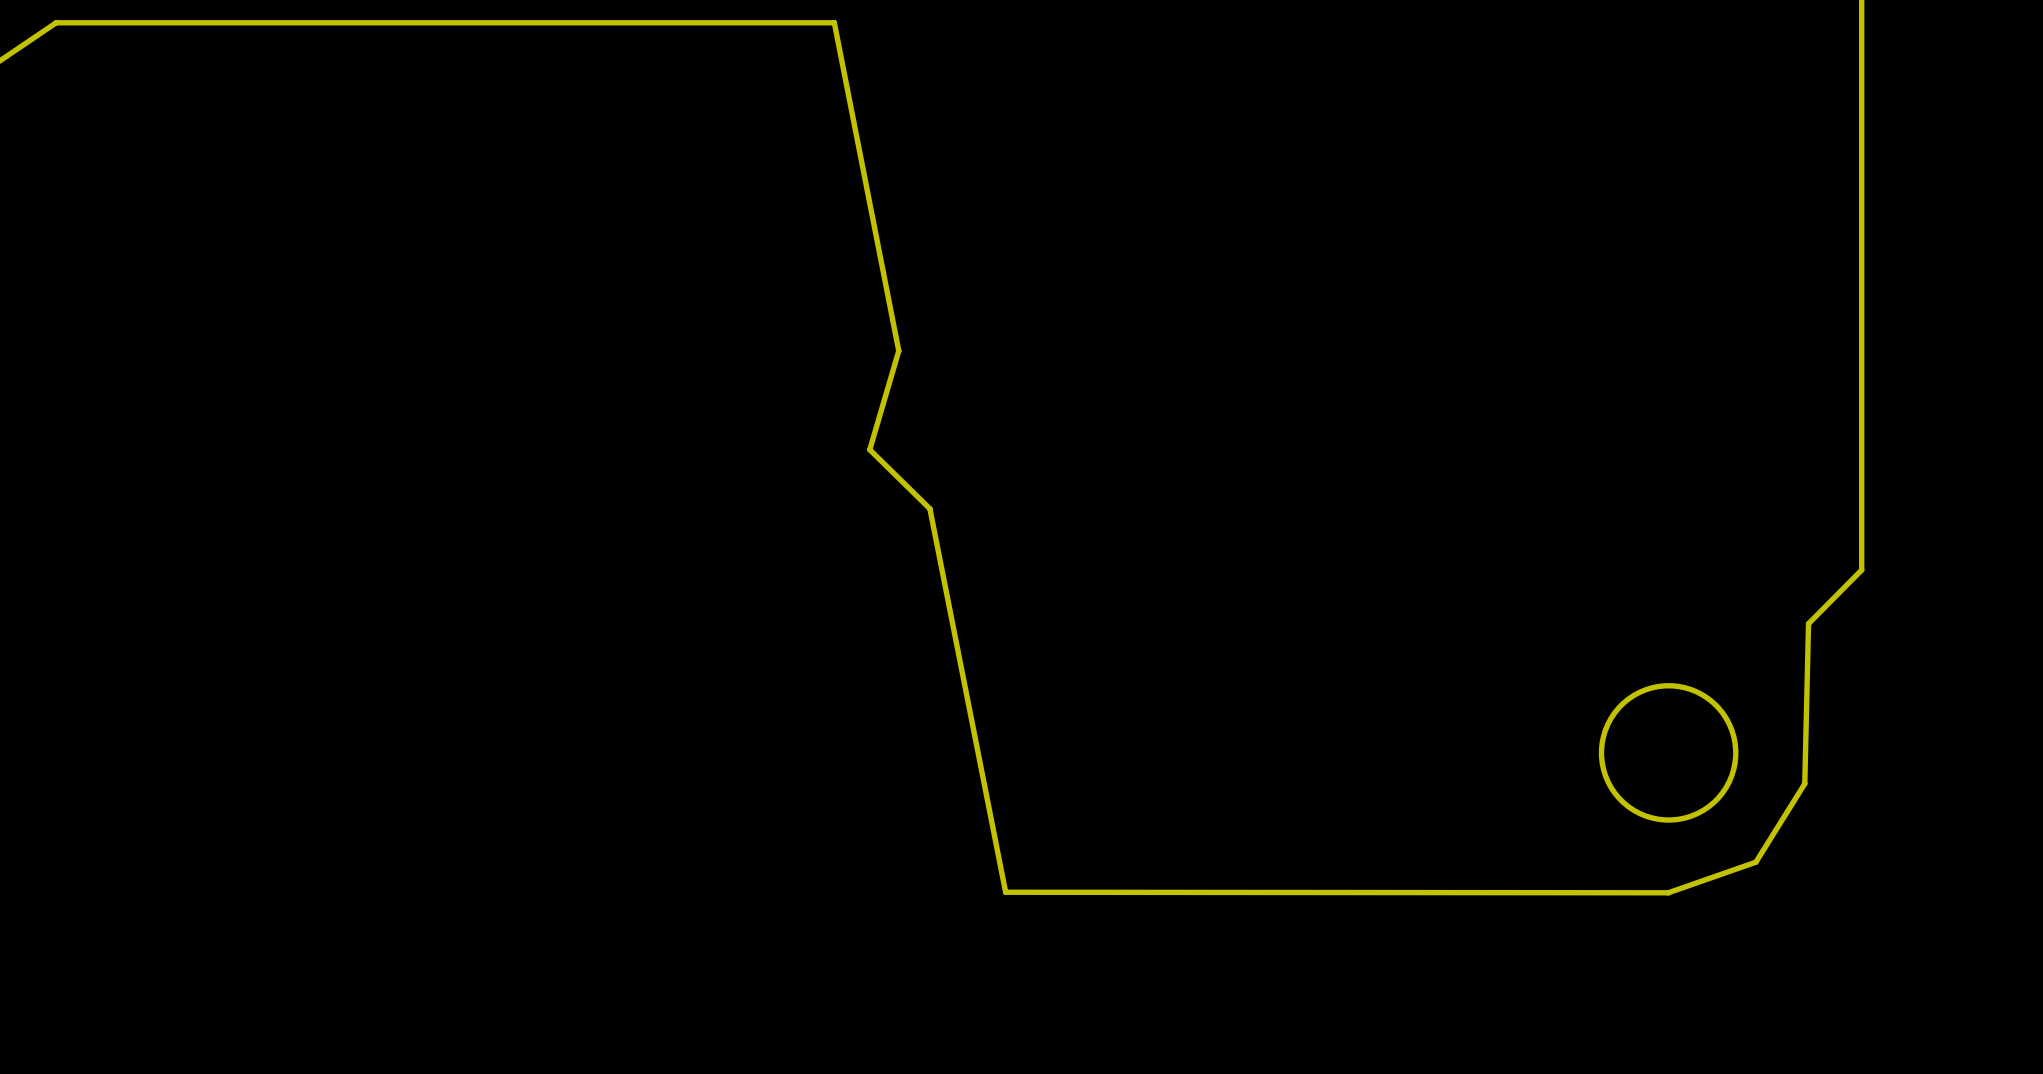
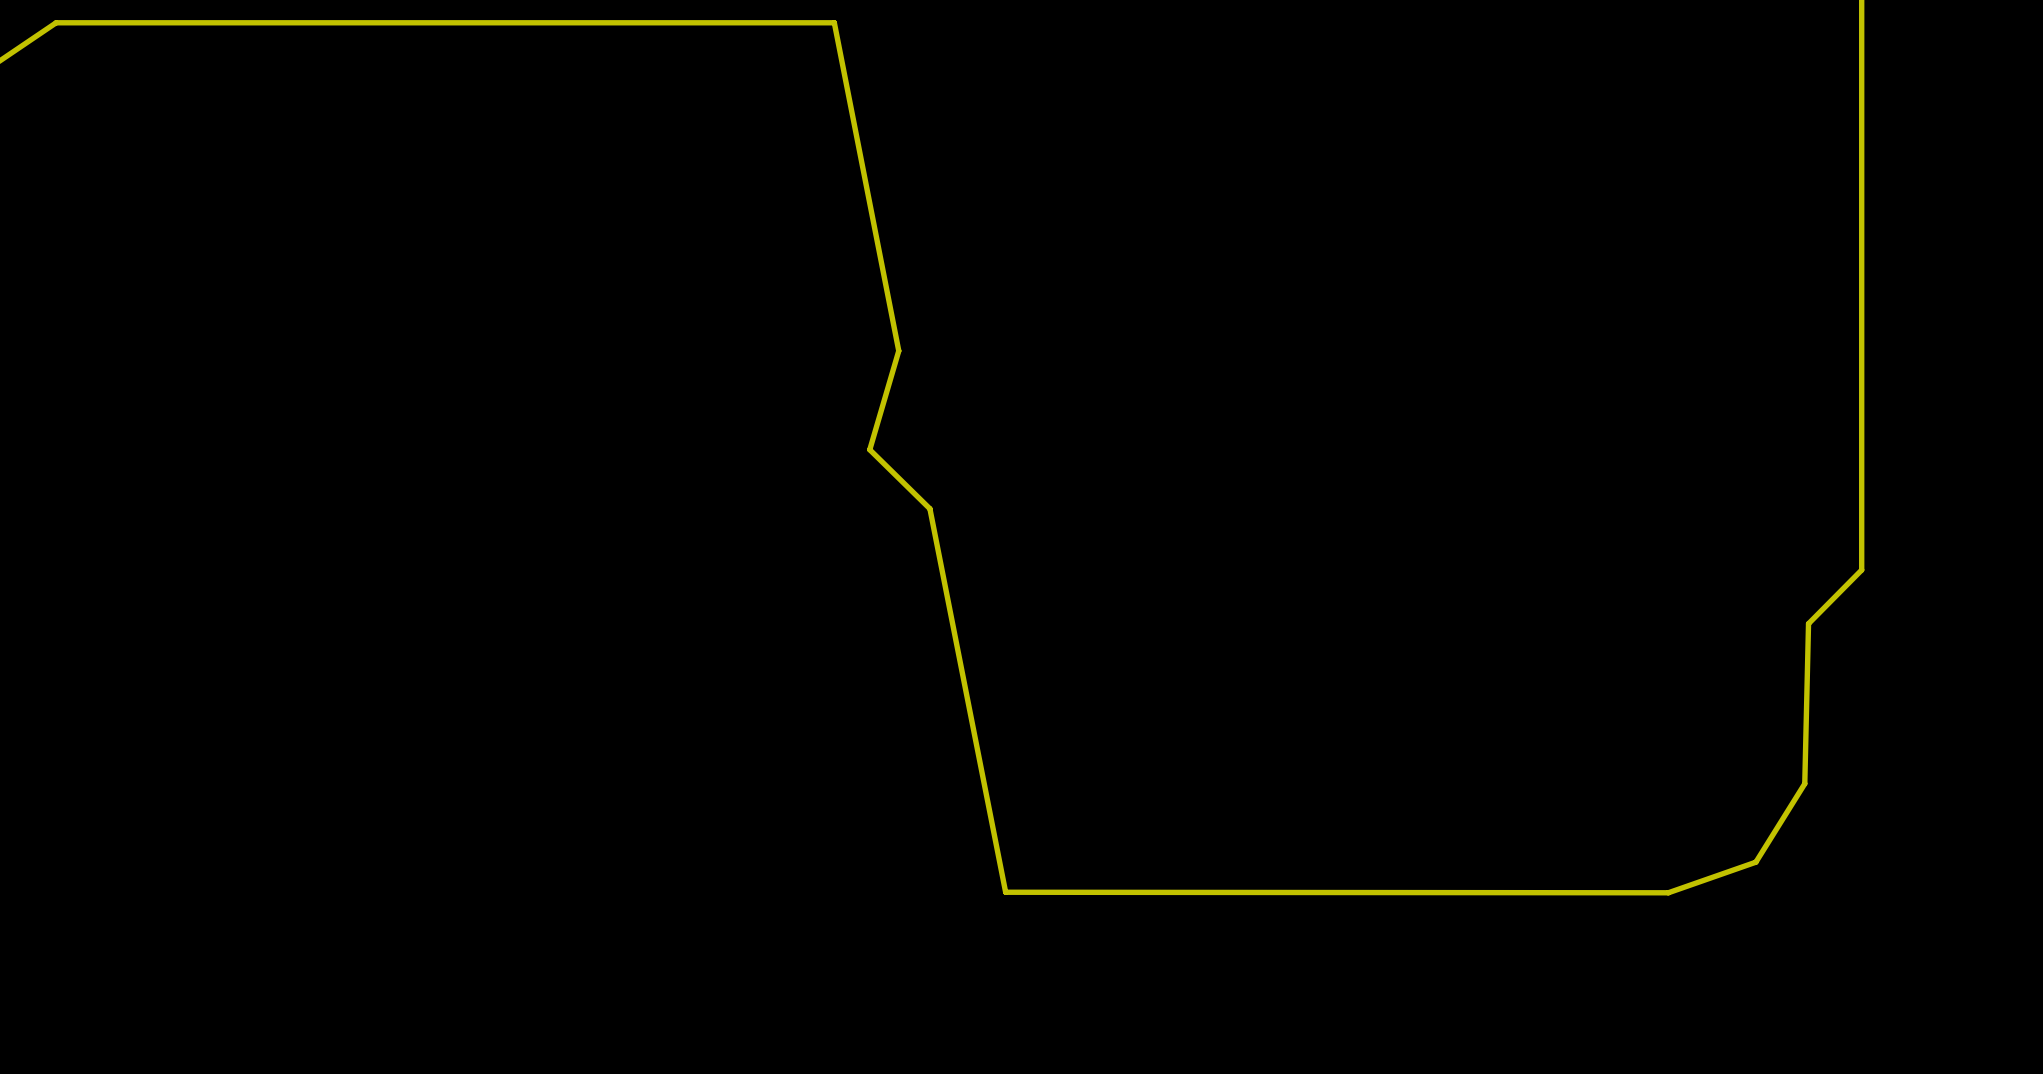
round board edge: [1598, 683, 1739, 823] -> none

